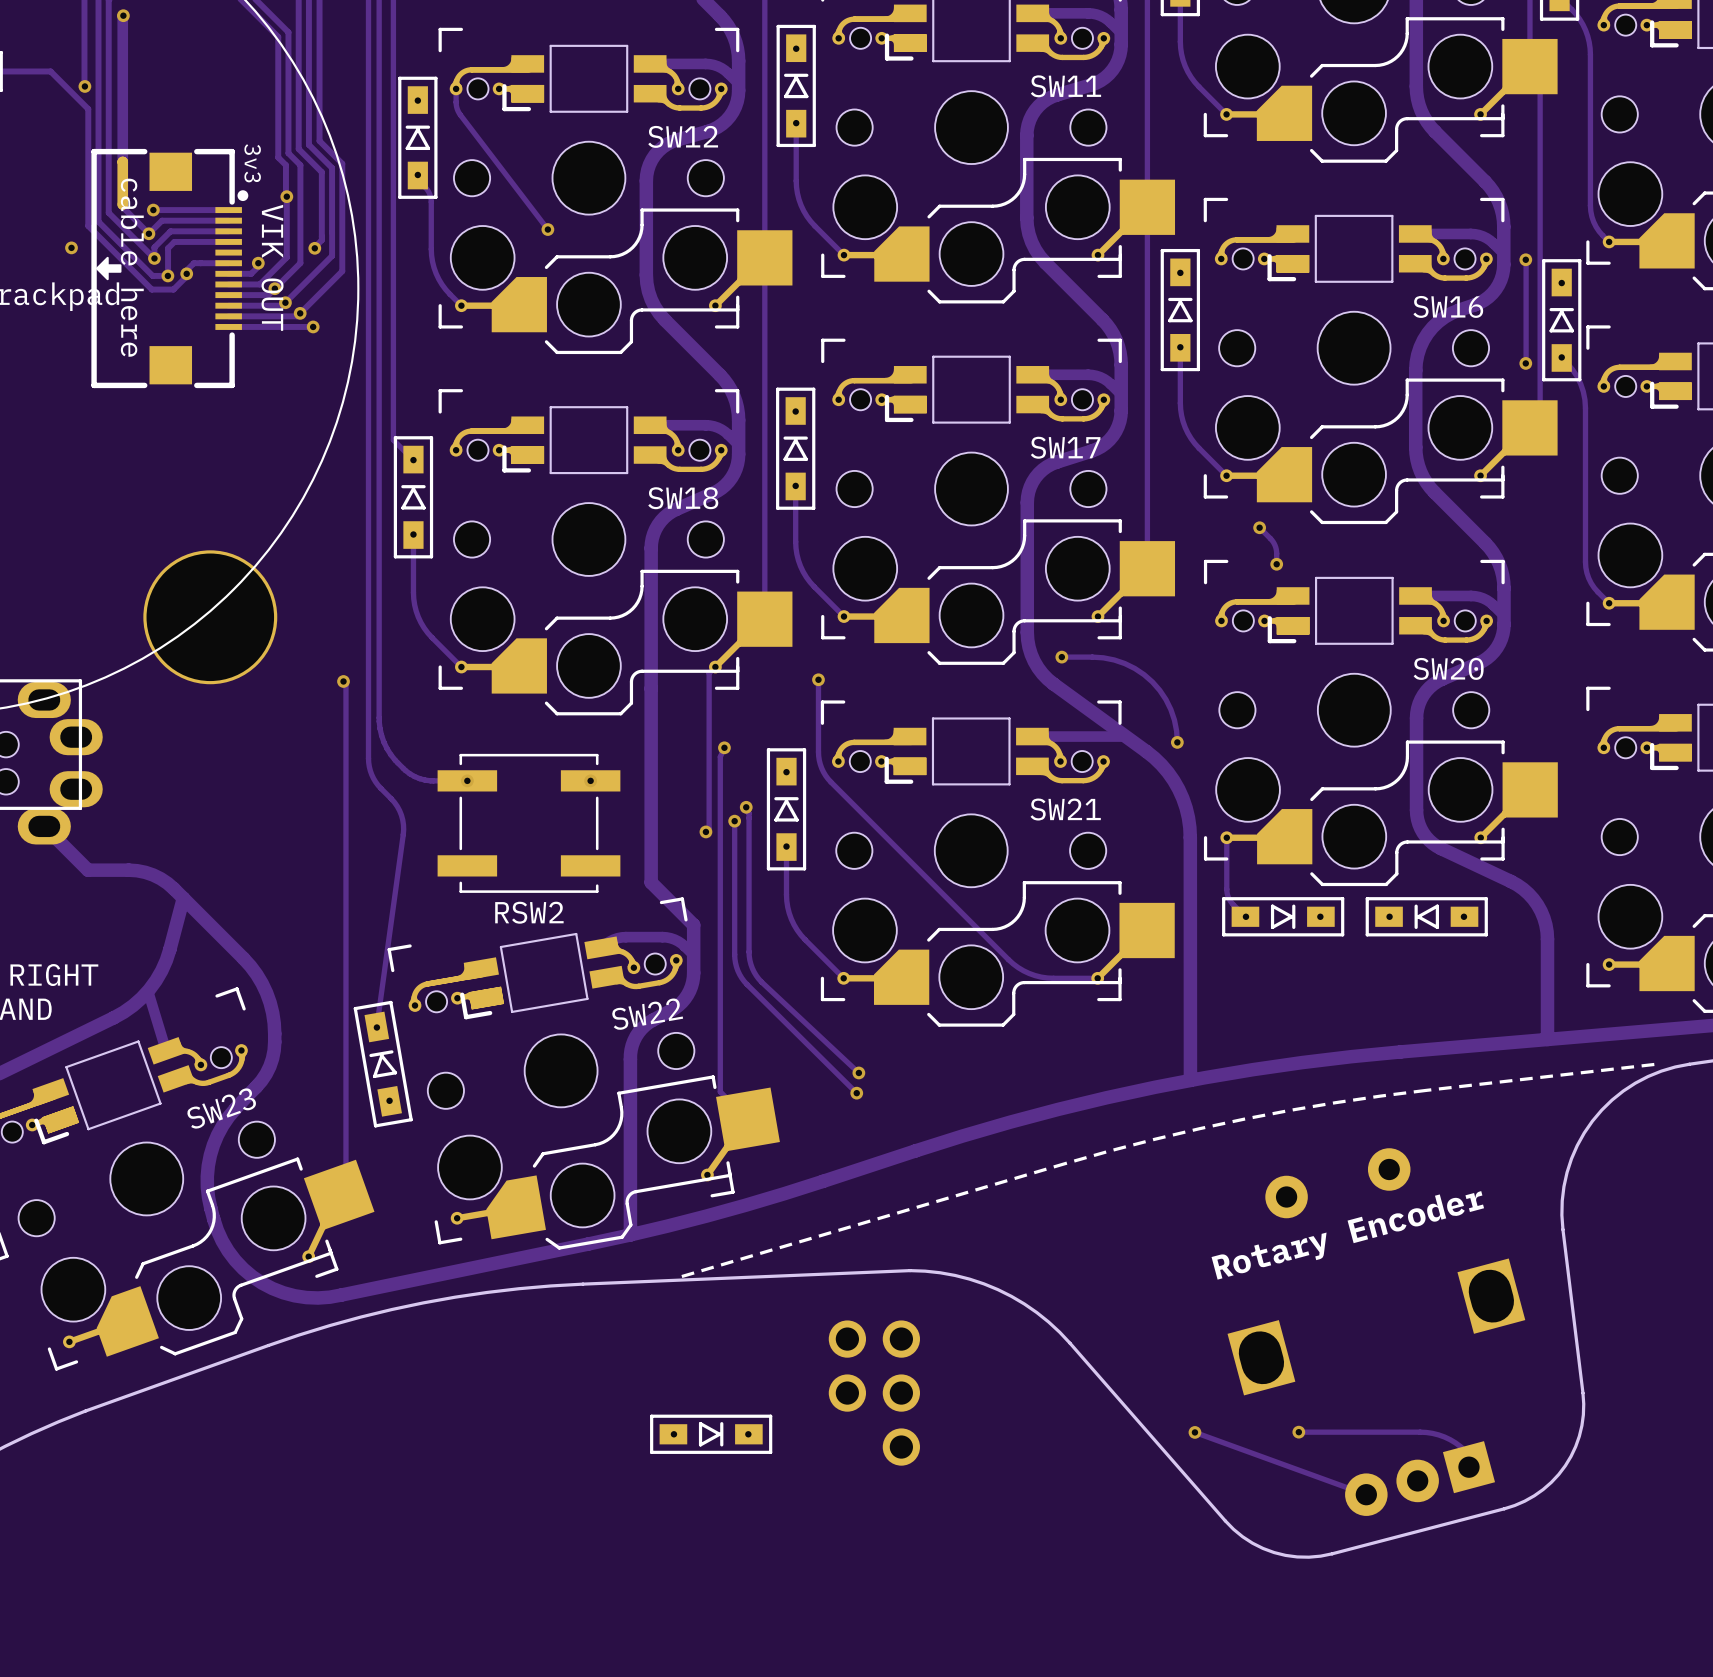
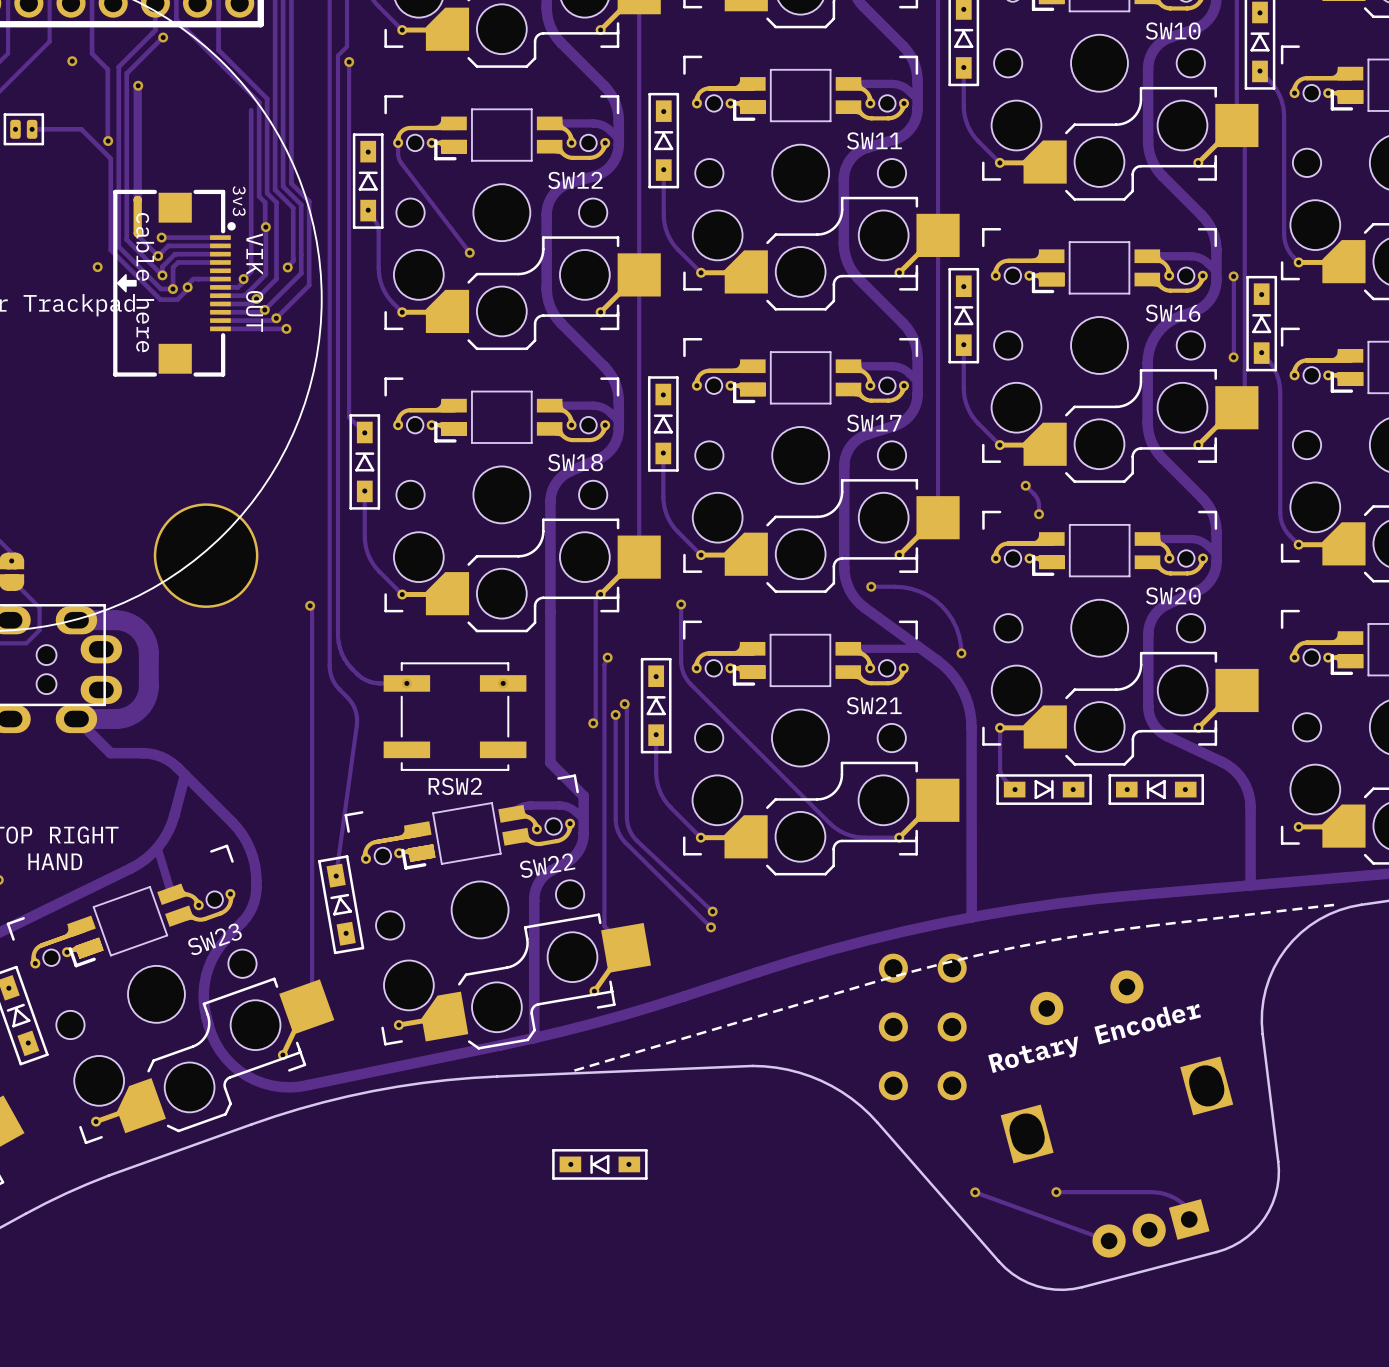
track: none -> (251, 110) (251, 271) (243, 279)
track: none -> (76, 620) (119, 620) (130, 623) (143, 635) (148, 653) (147, 693) (139, 709) (130, 715) (119, 718) (76, 719)
part: none -> (922, 1026)
part: (874, 1393) -> none
part rotation: 0° (711, 1434) -> 180° (599, 1164)

